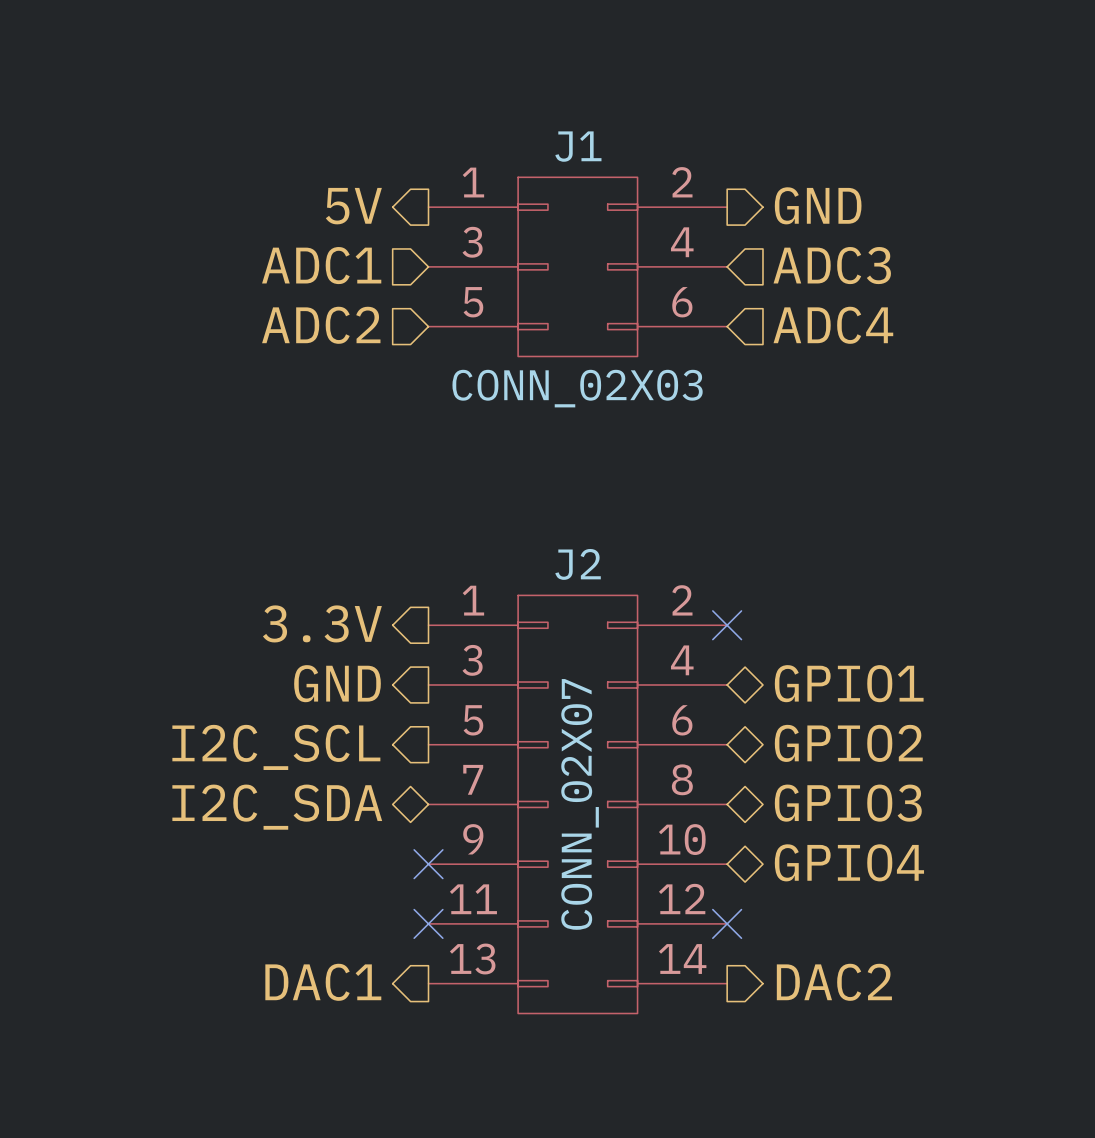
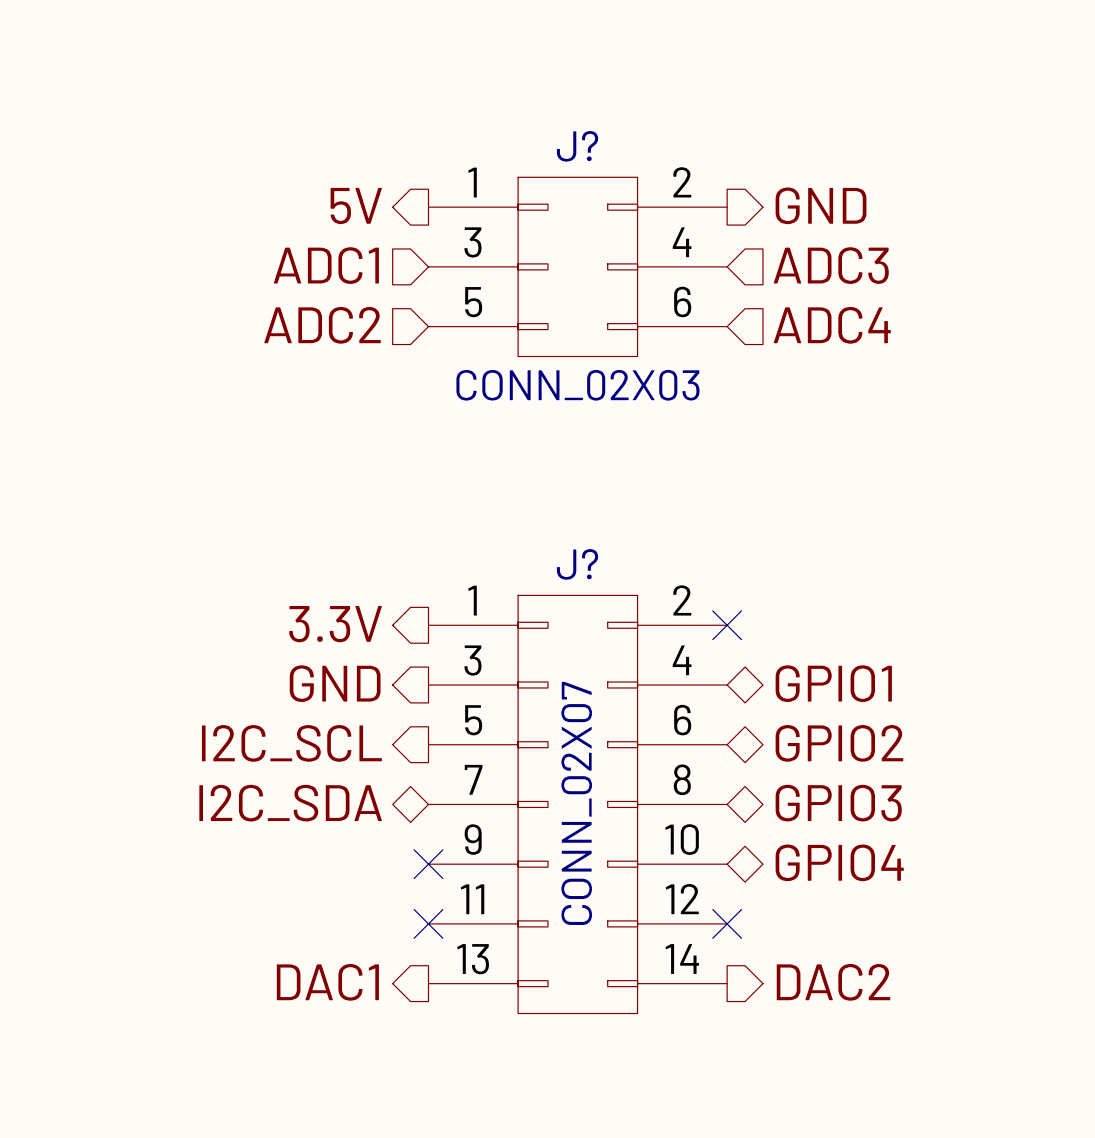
J1 name: J1 (578, 146) -> J? (577, 146)
J2 name: J2 (578, 564) -> J? (577, 564)

